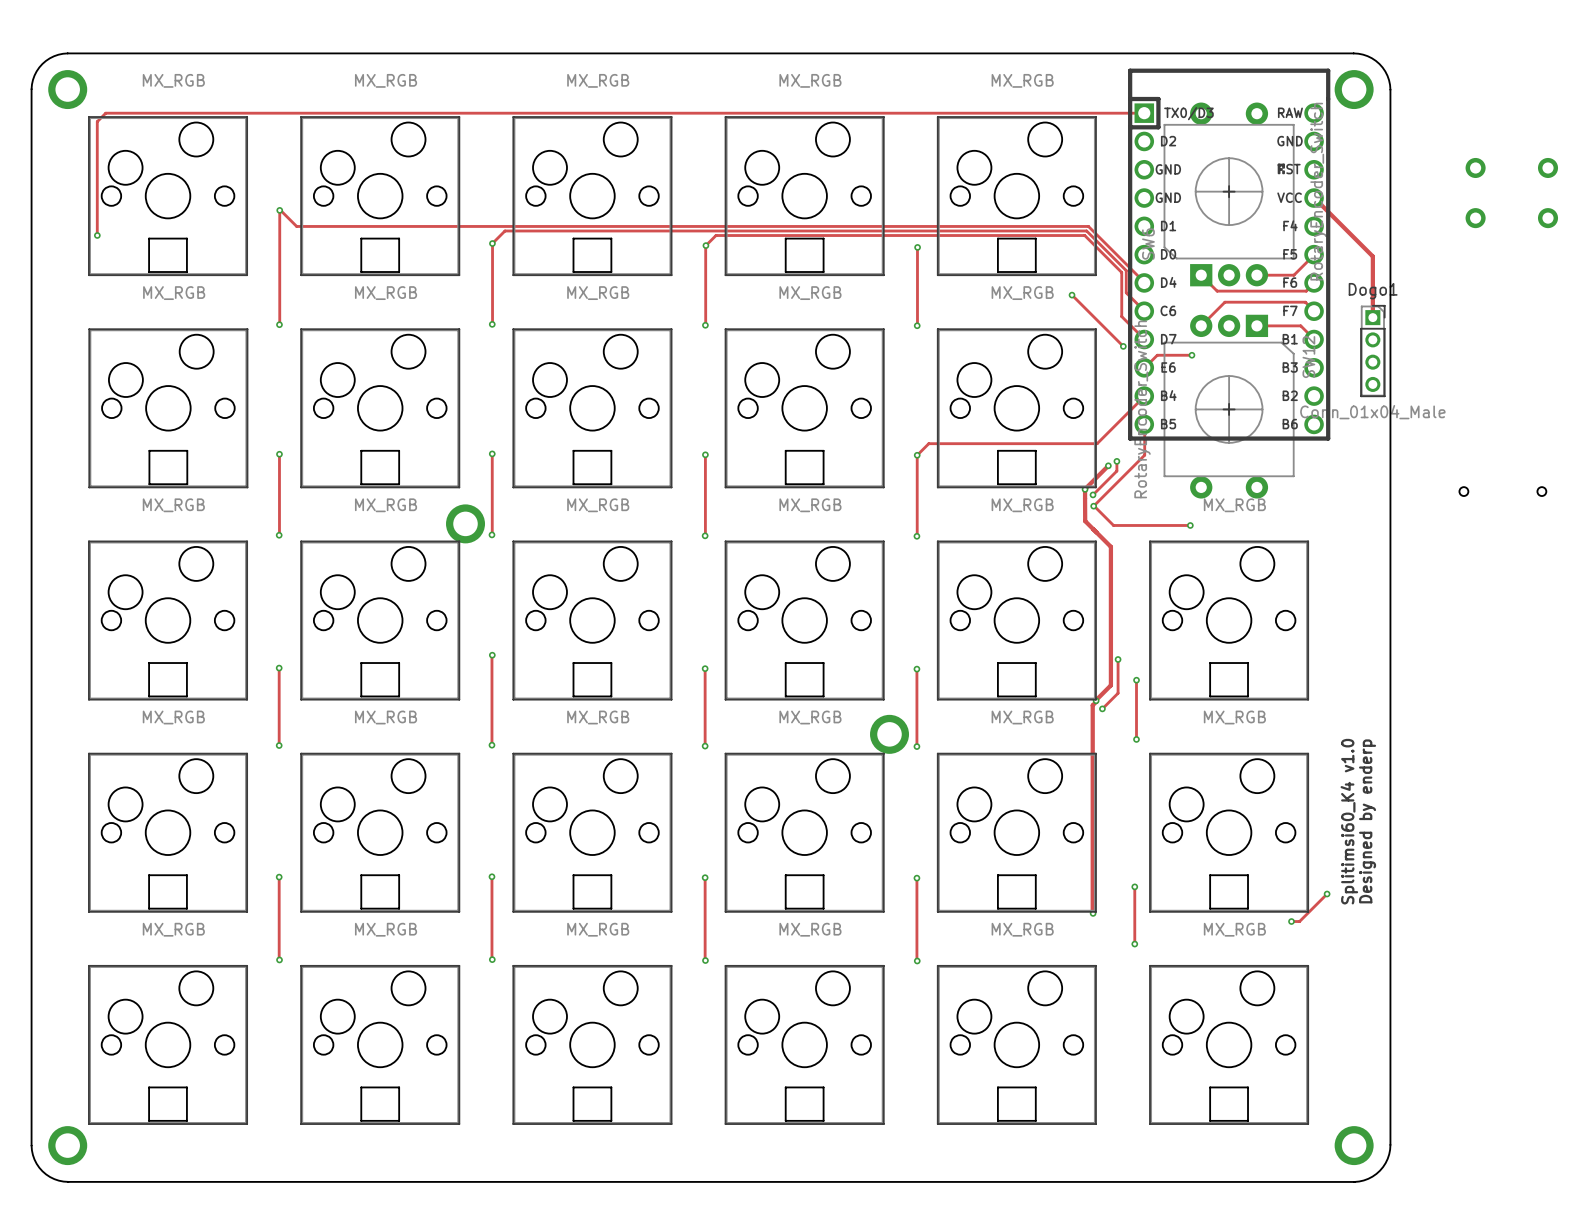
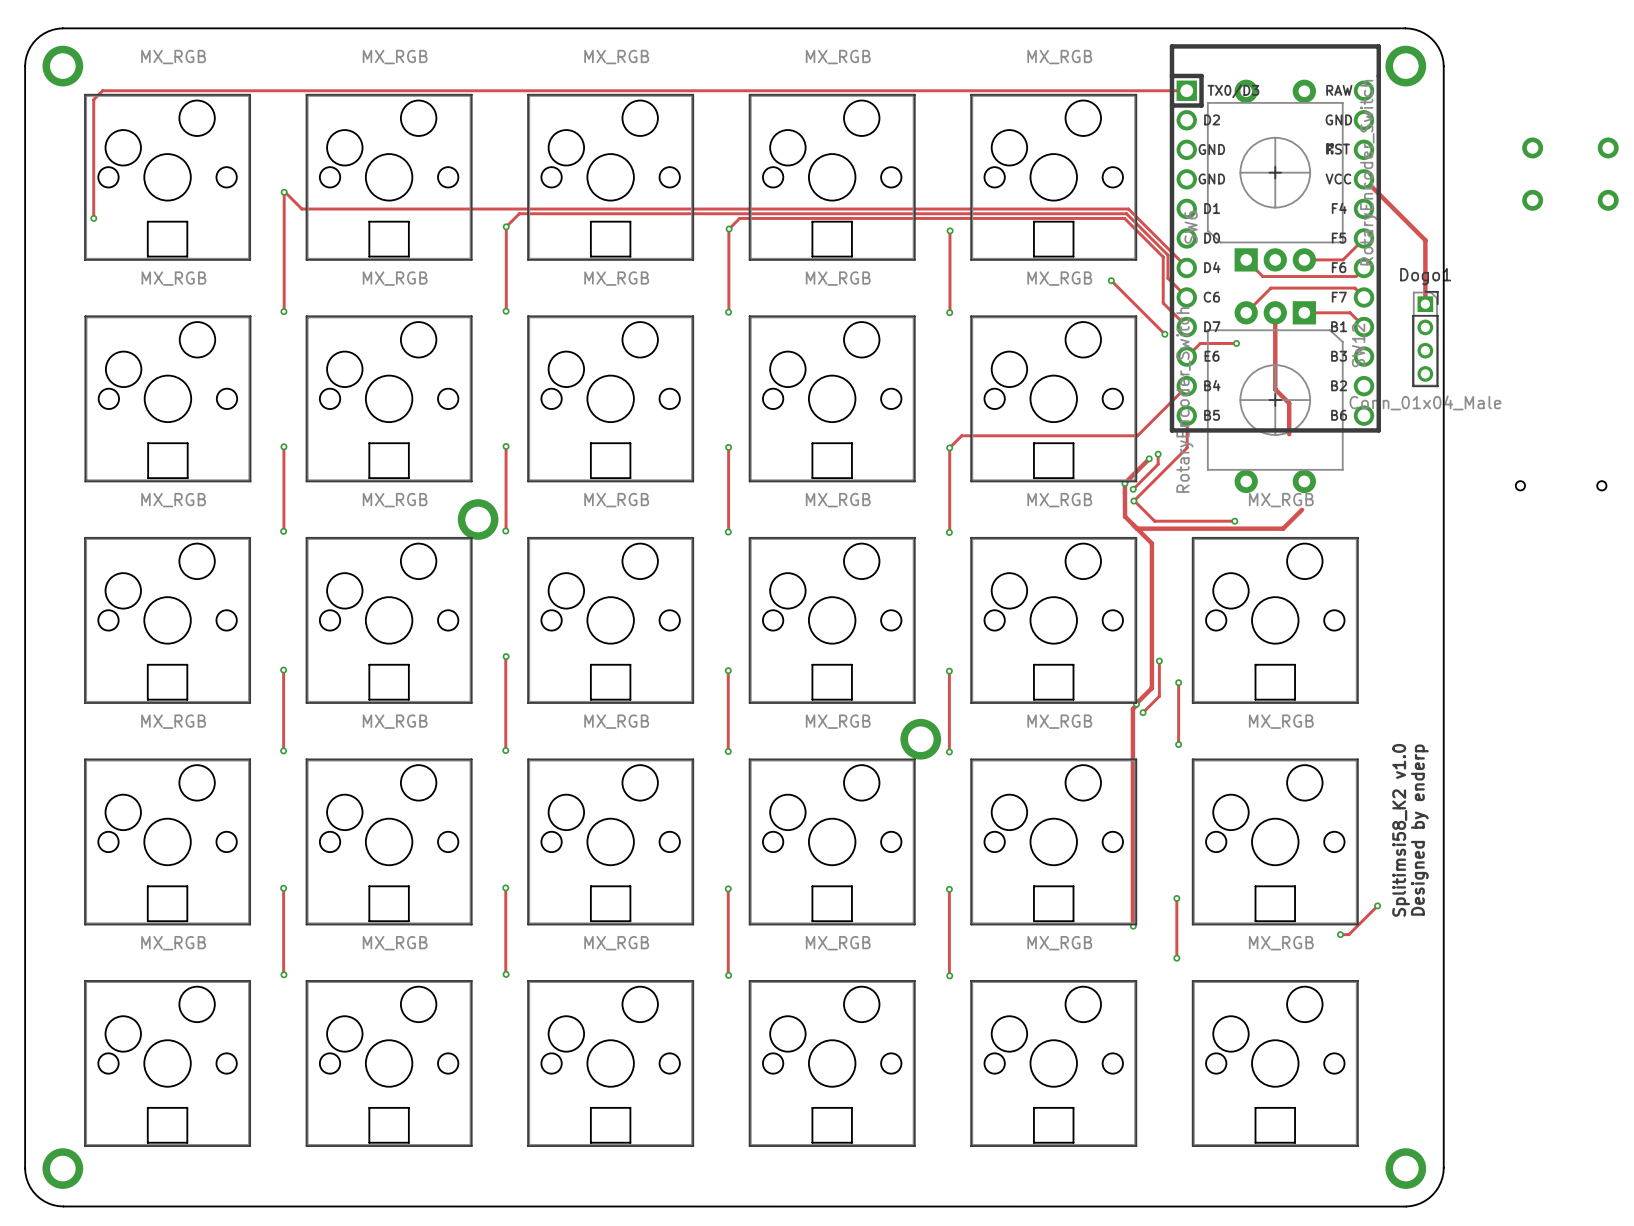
track: none -> (1275, 312) (1275, 389) (1289, 403) (1289, 434)
track: none -> (1302, 509) (1283, 528) (1137, 528)
text: Splitimsi60_K4 v1.0 (1349, 821) -> Splitimsi58_K2 v1.0 (1401, 830)

